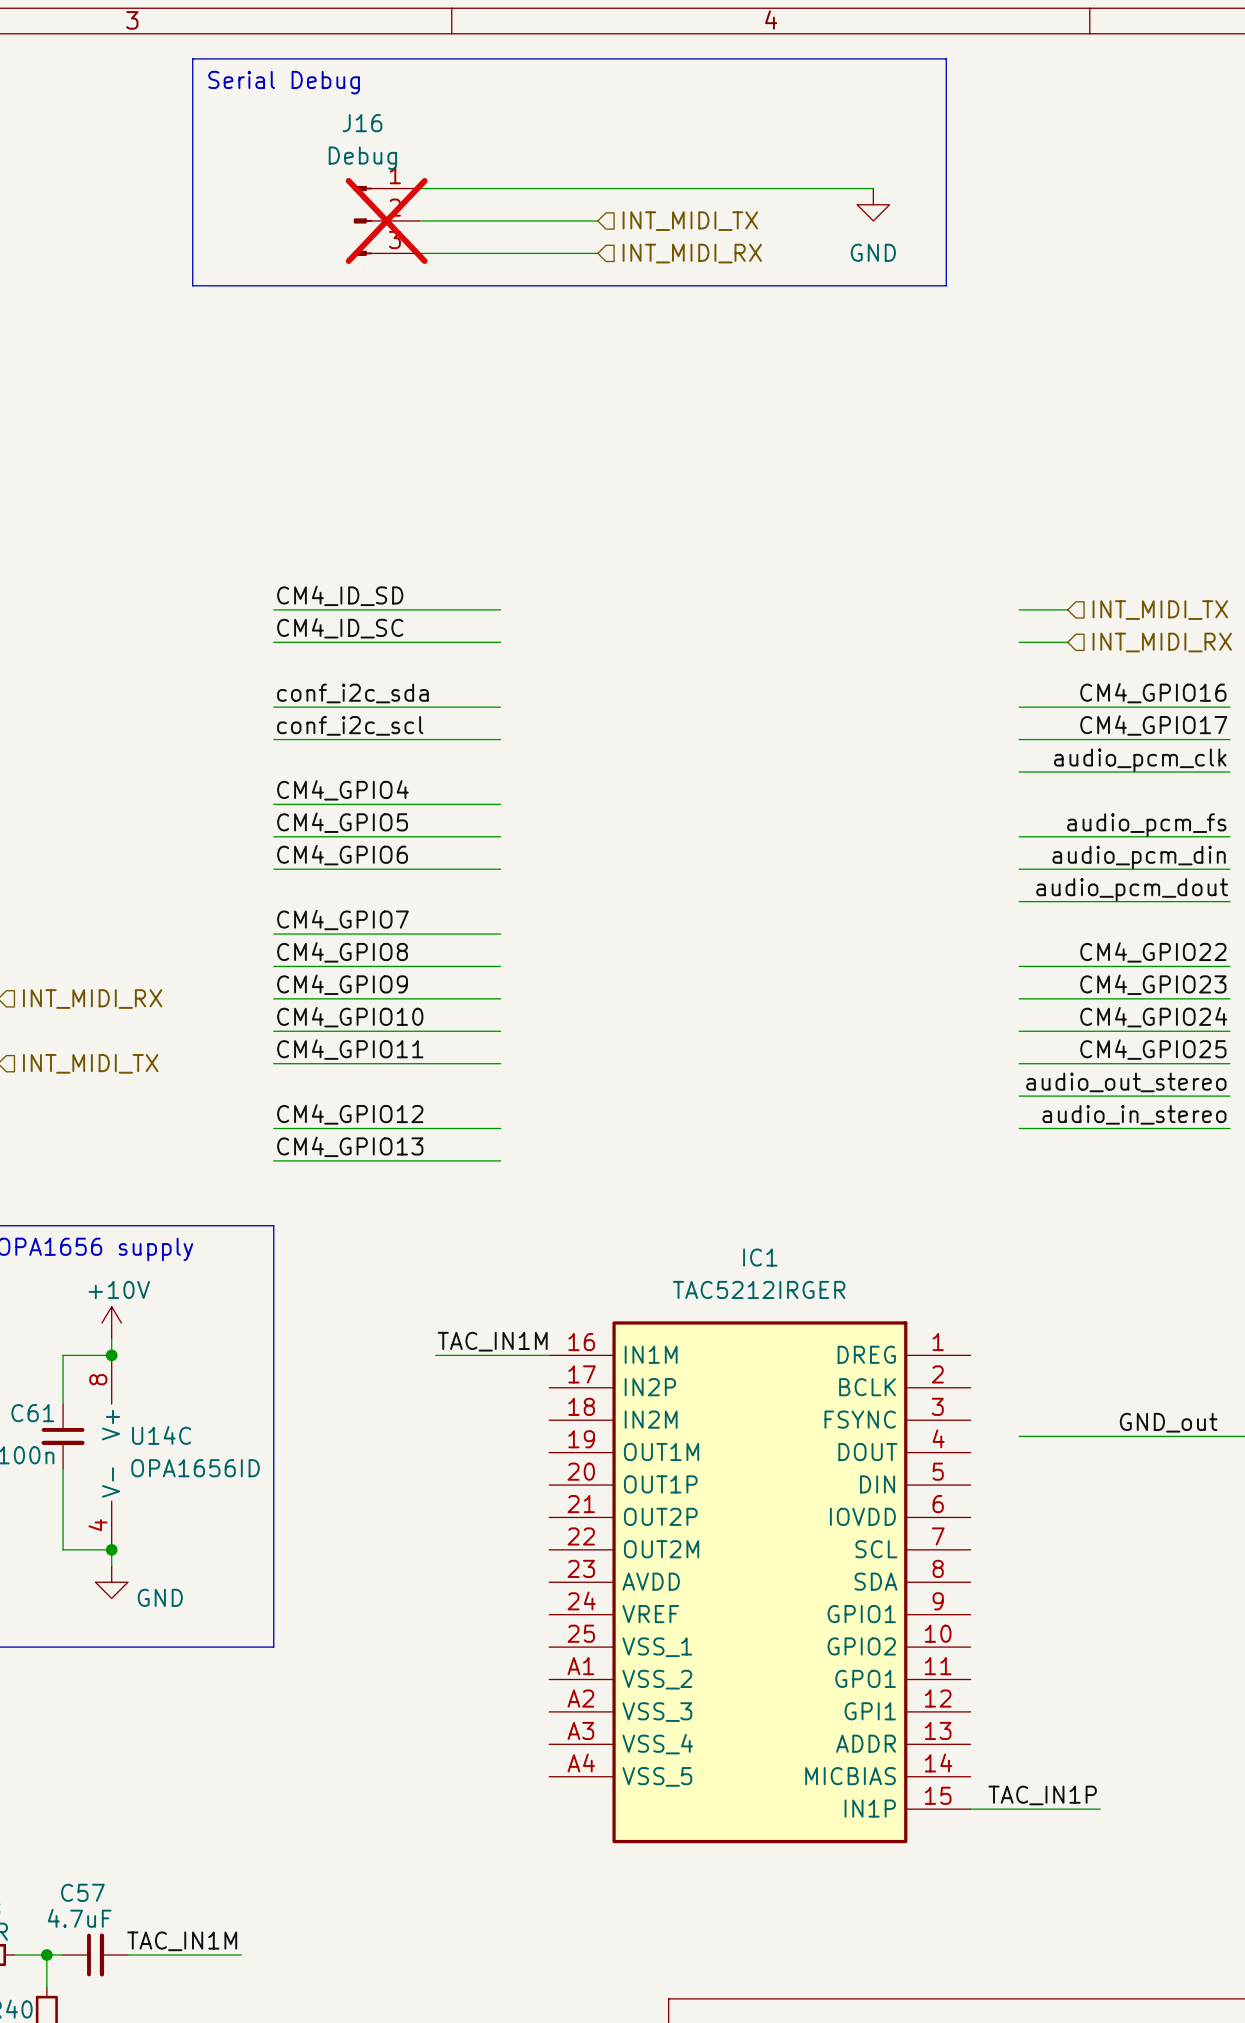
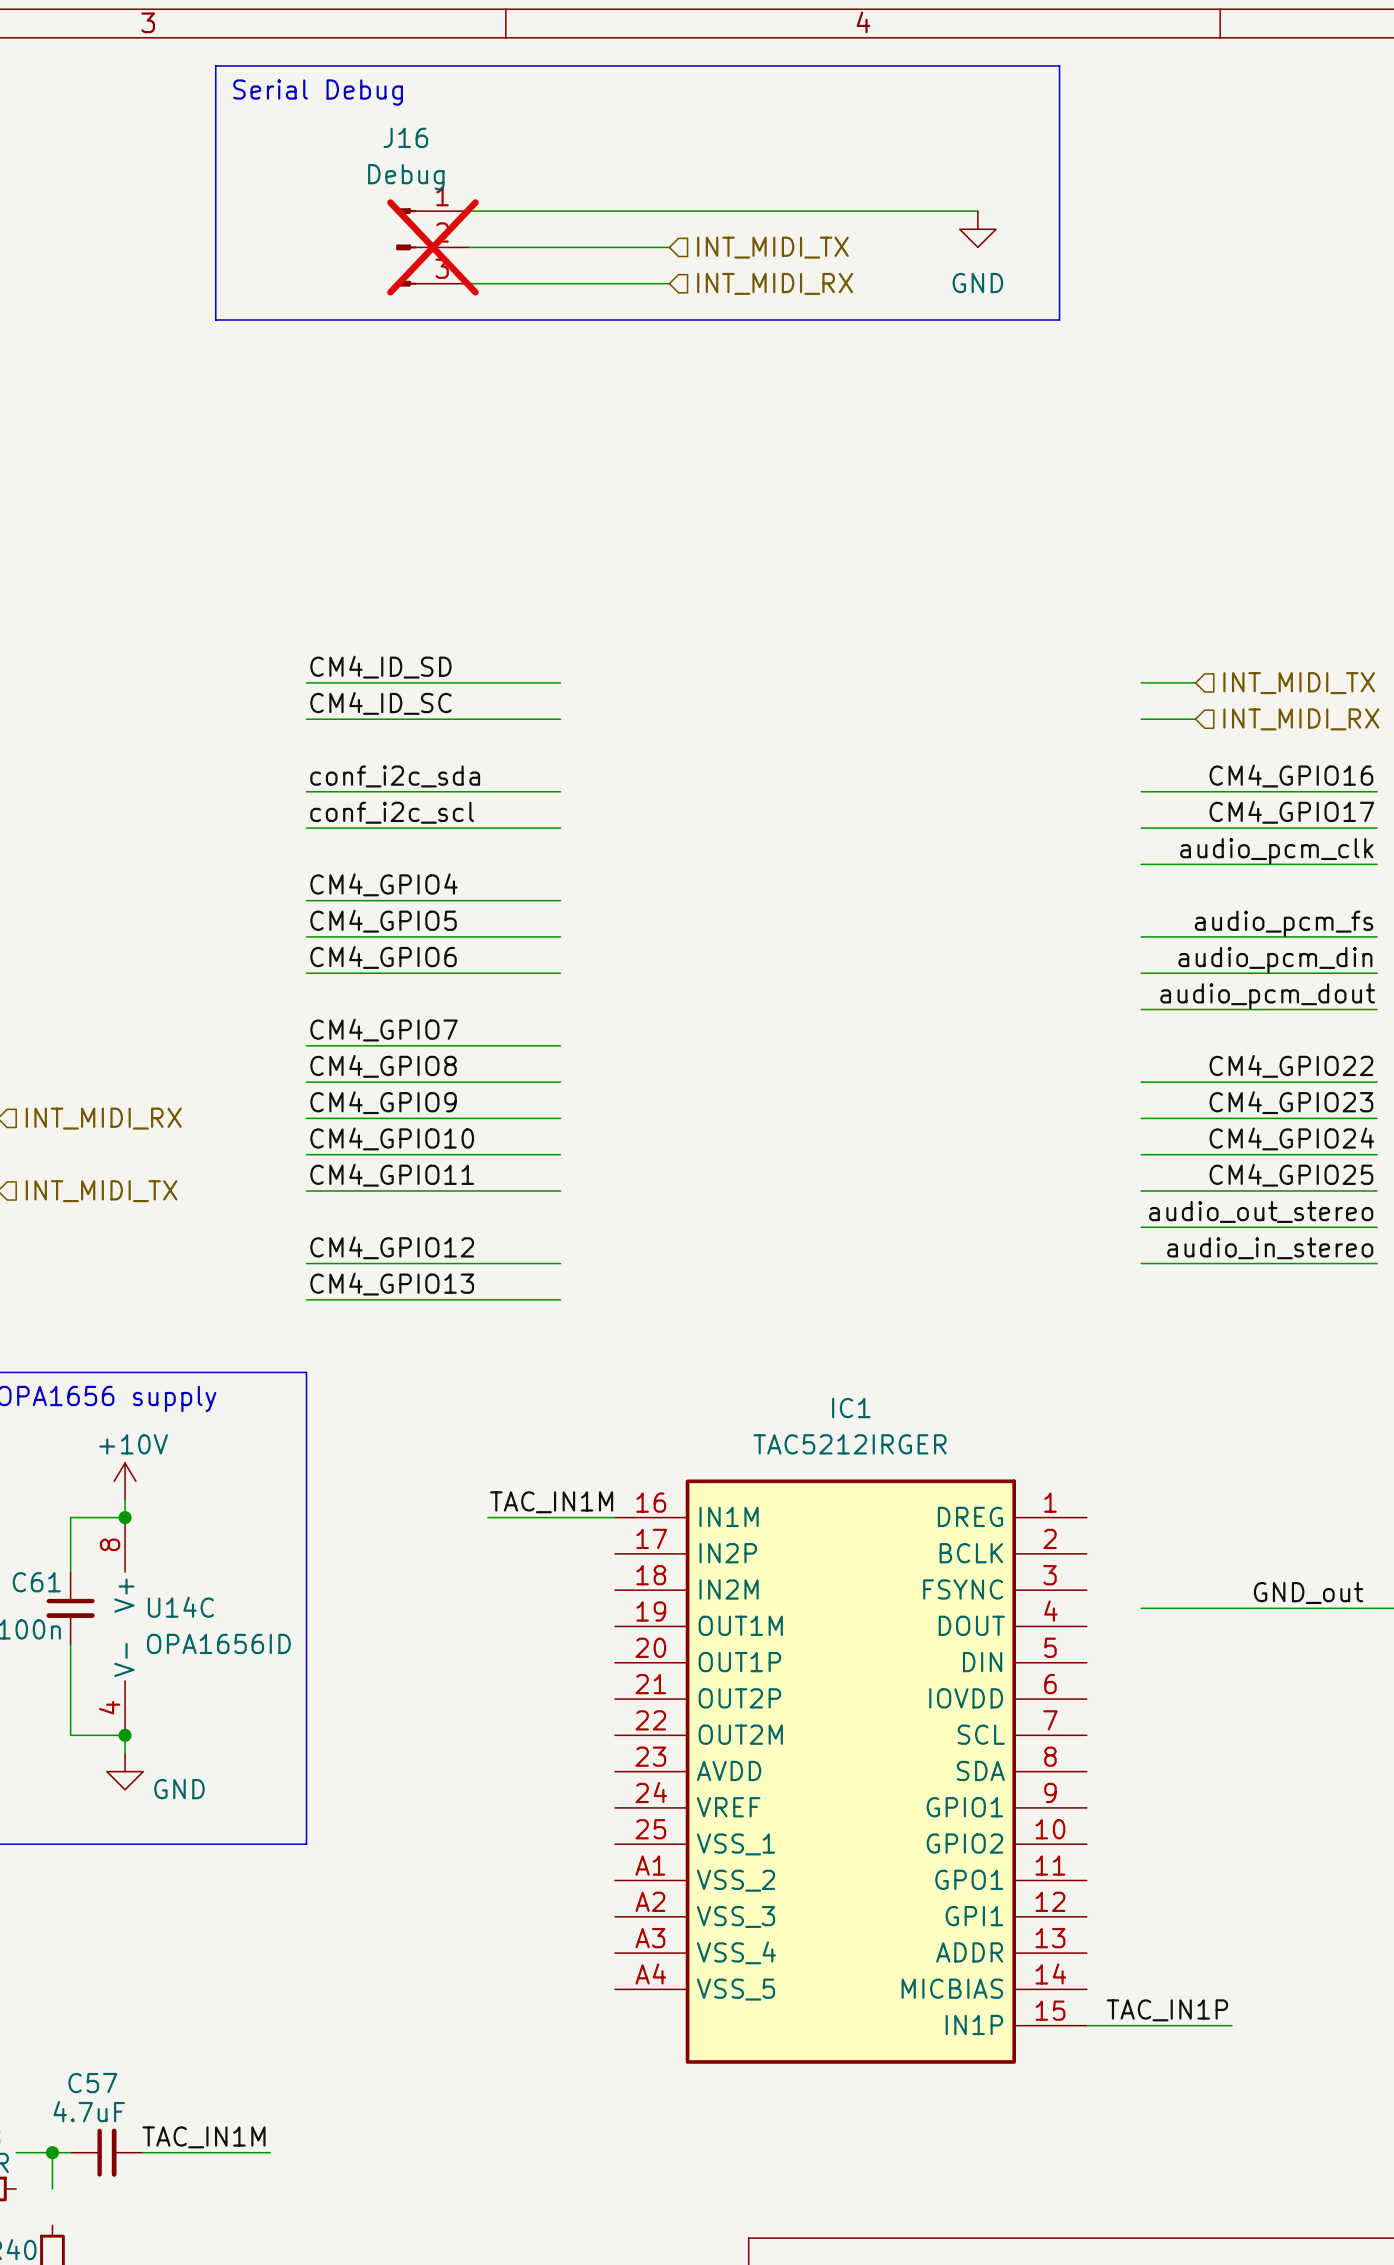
label position: TAC_IN1M (182, 1941) -> TAC_IN1M (203, 2137)
wire: (14, 1955) (63, 1955) -> (16, 2152) (70, 2152)
wire: (46, 1955) (46, 1987) -> (52, 2188) (52, 2152)
junction position: (46, 1955) -> (52, 2152)
C57 position: (95, 1955) -> (106, 2152)
wire: (127, 1955) (241, 1955) -> (143, 2152) (270, 2152)

